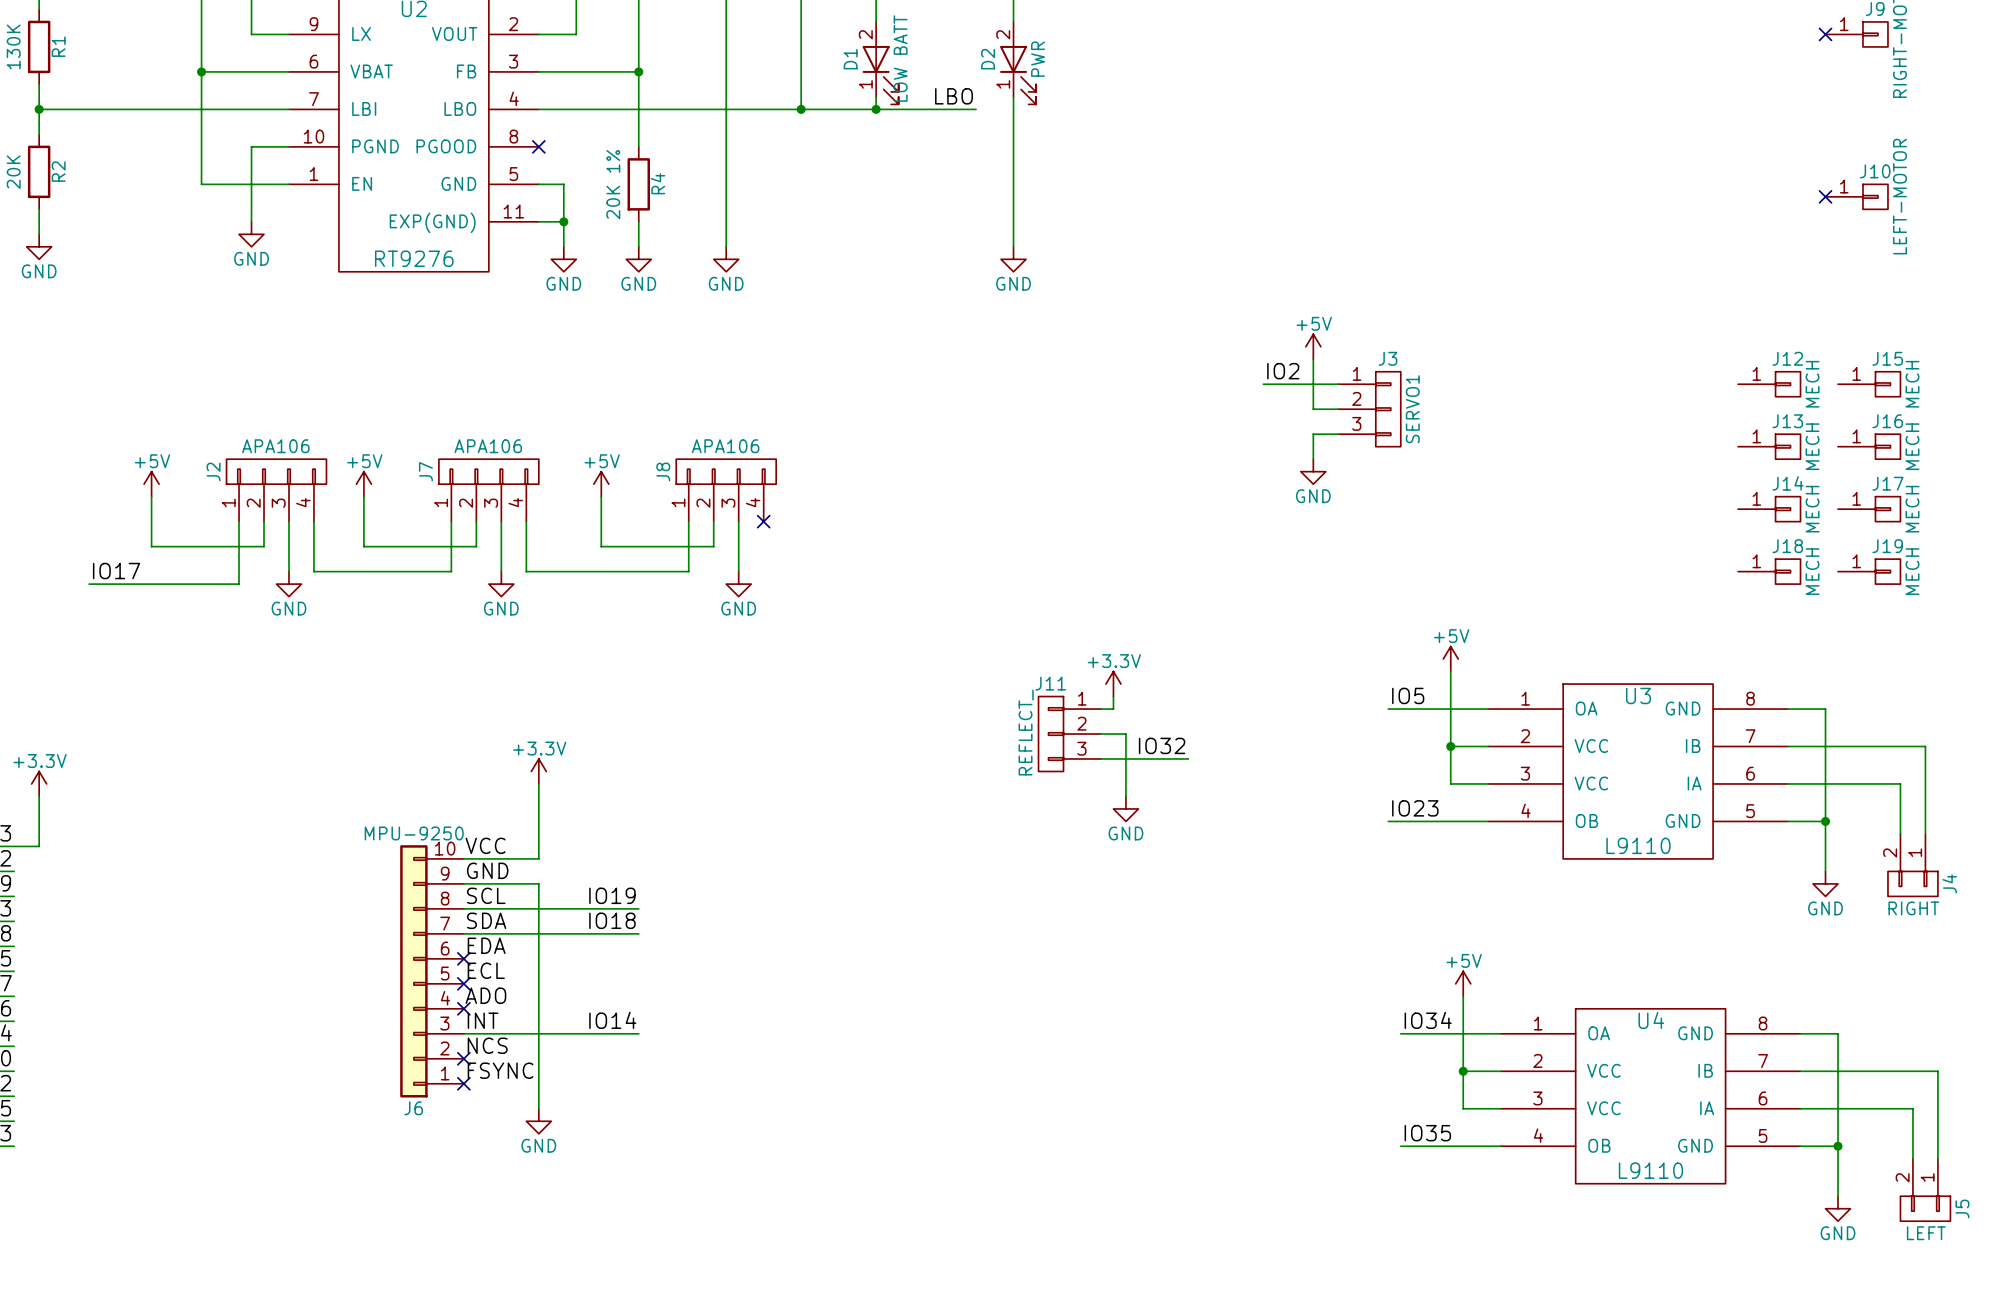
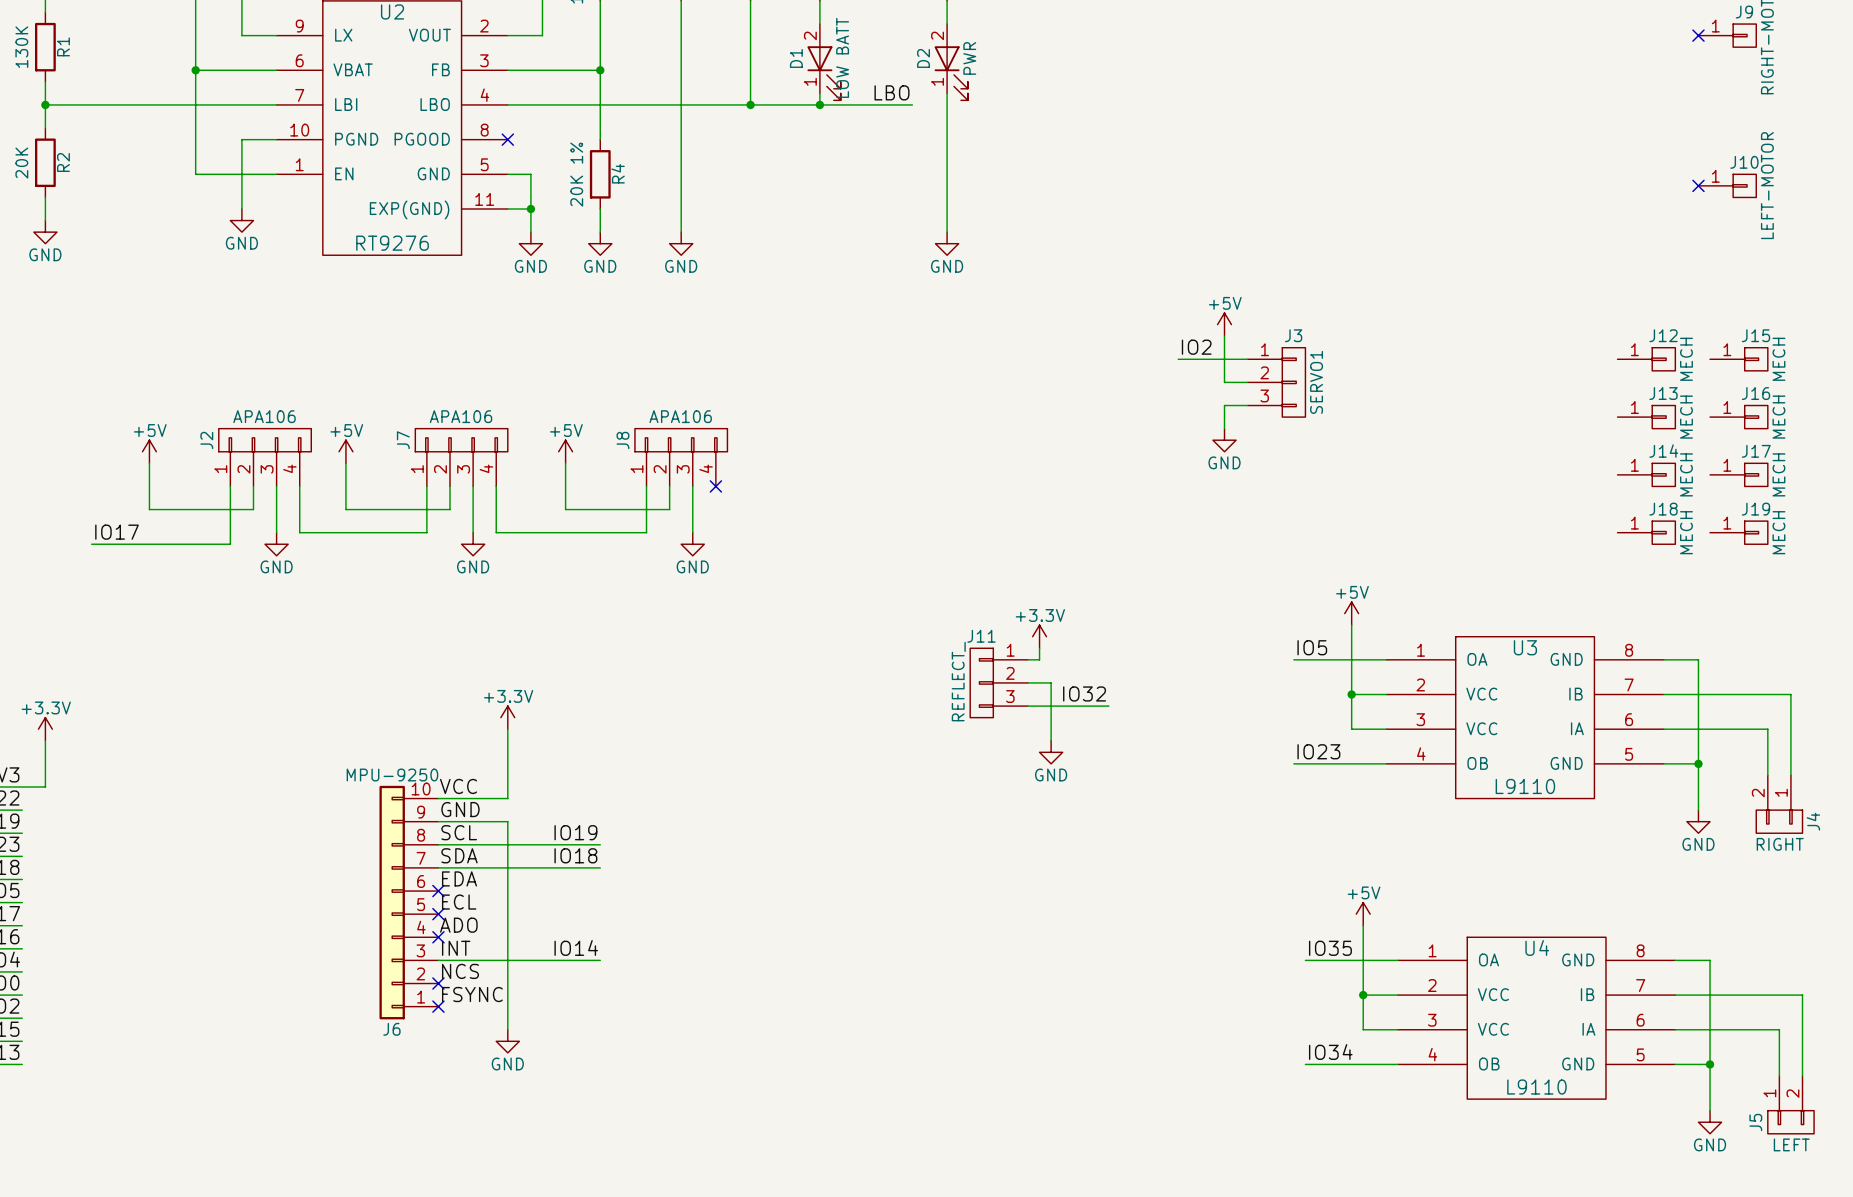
label: IO34 (1428, 1020) -> IO35 (1330, 948)
label: IO35 (1427, 1133) -> IO34 (1330, 1052)
J5 flip: as is (1925, 1208) -> left-right (1790, 1122)

